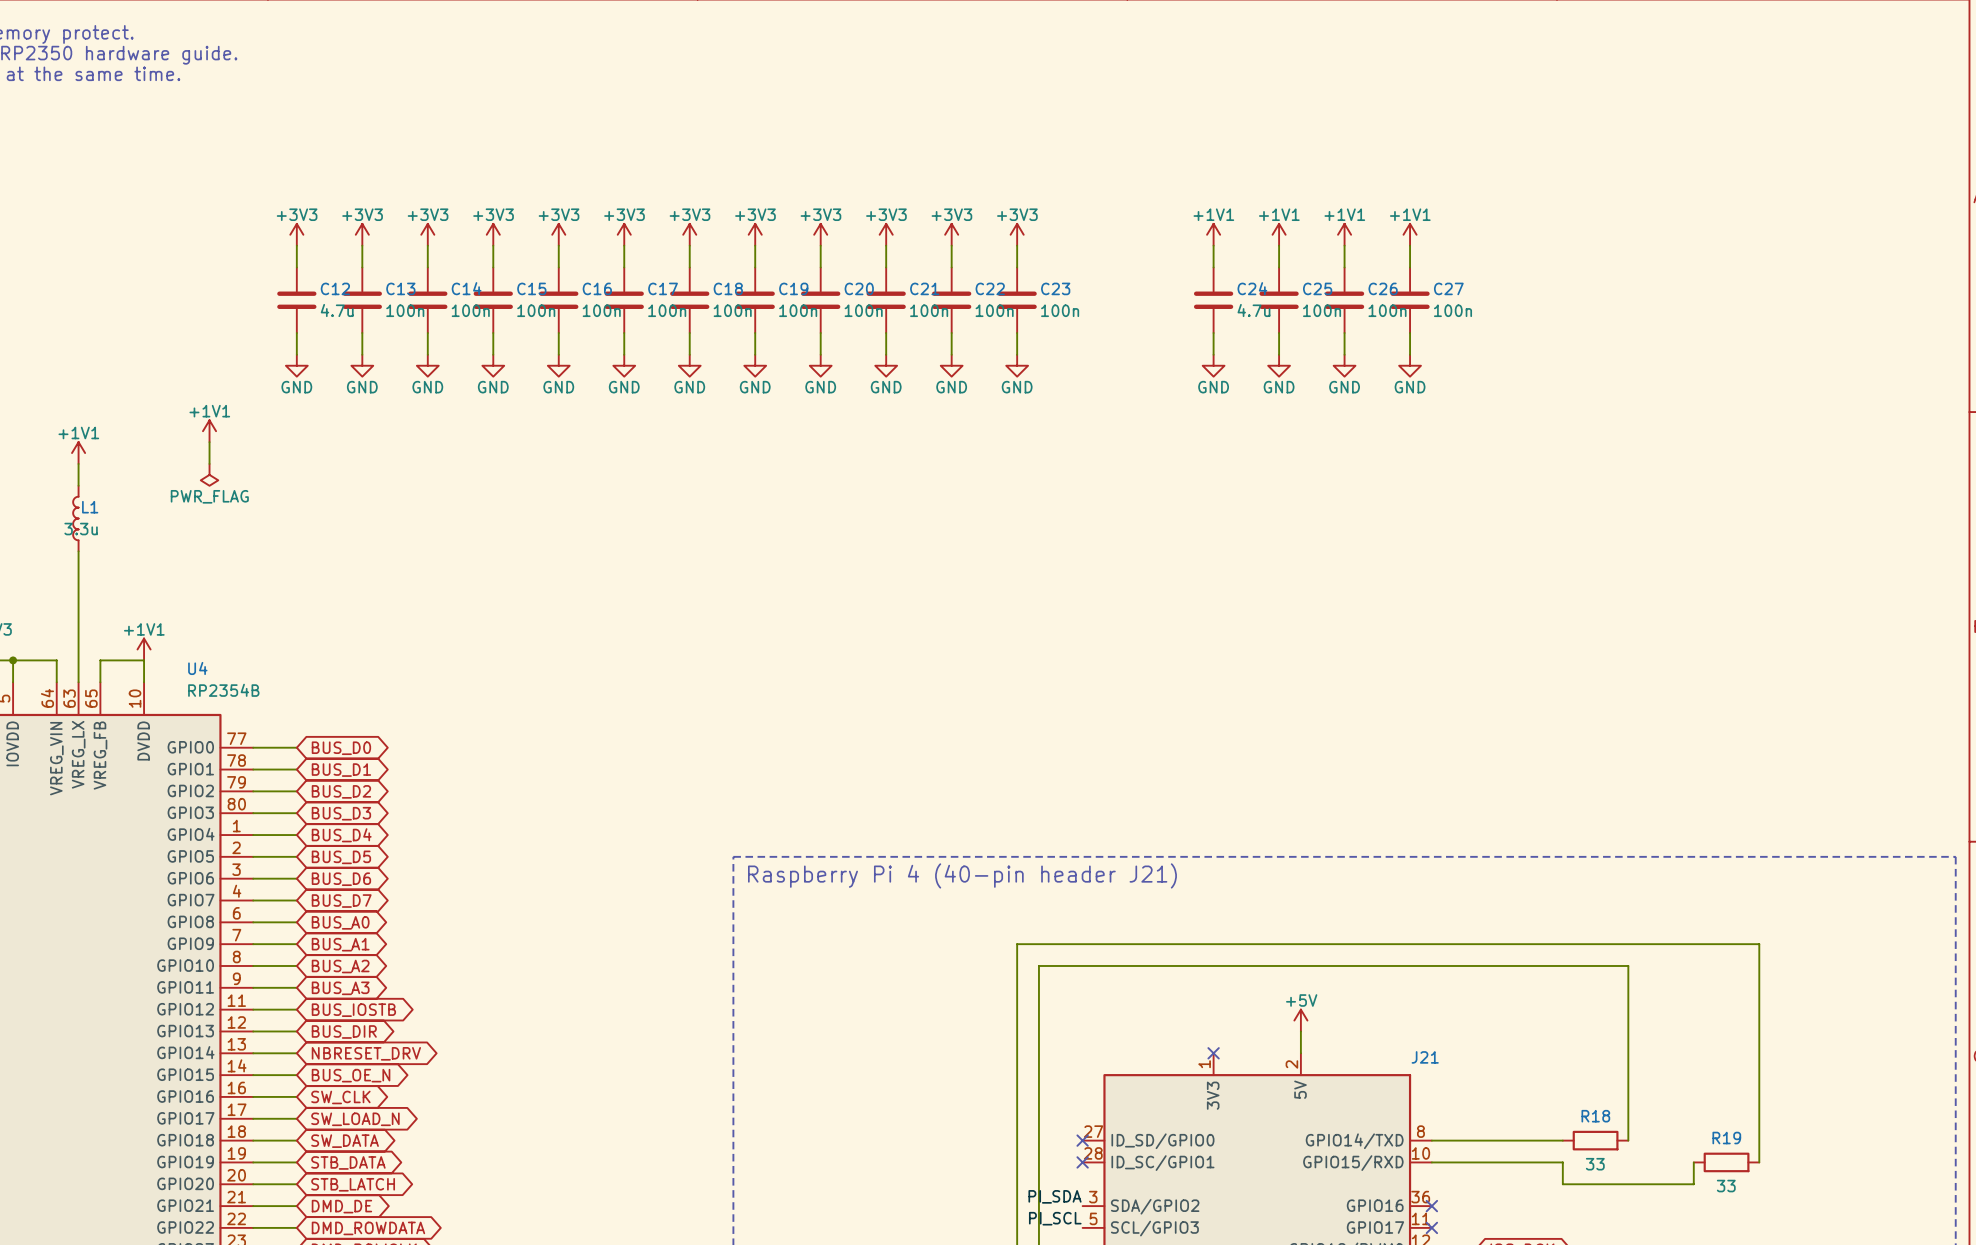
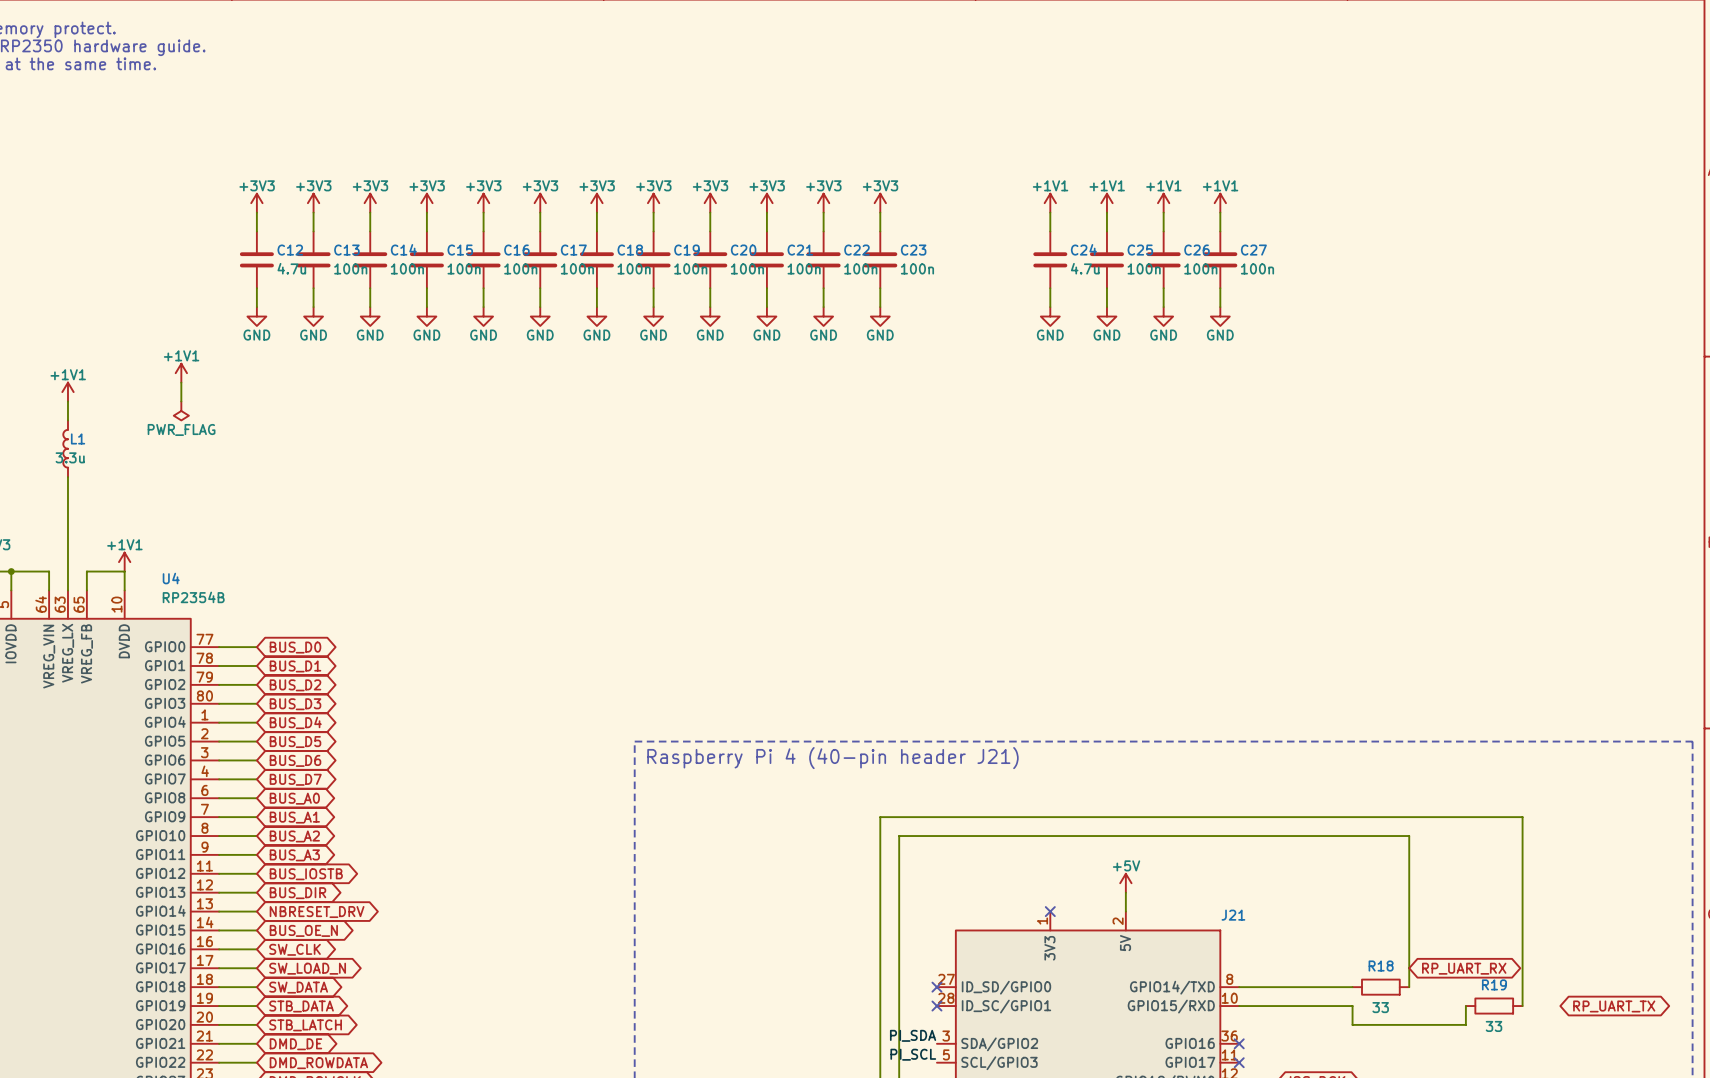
global label: none -> RP_UART_RX (1464, 968)
global label: none -> RP_UART_TX (1614, 1006)

